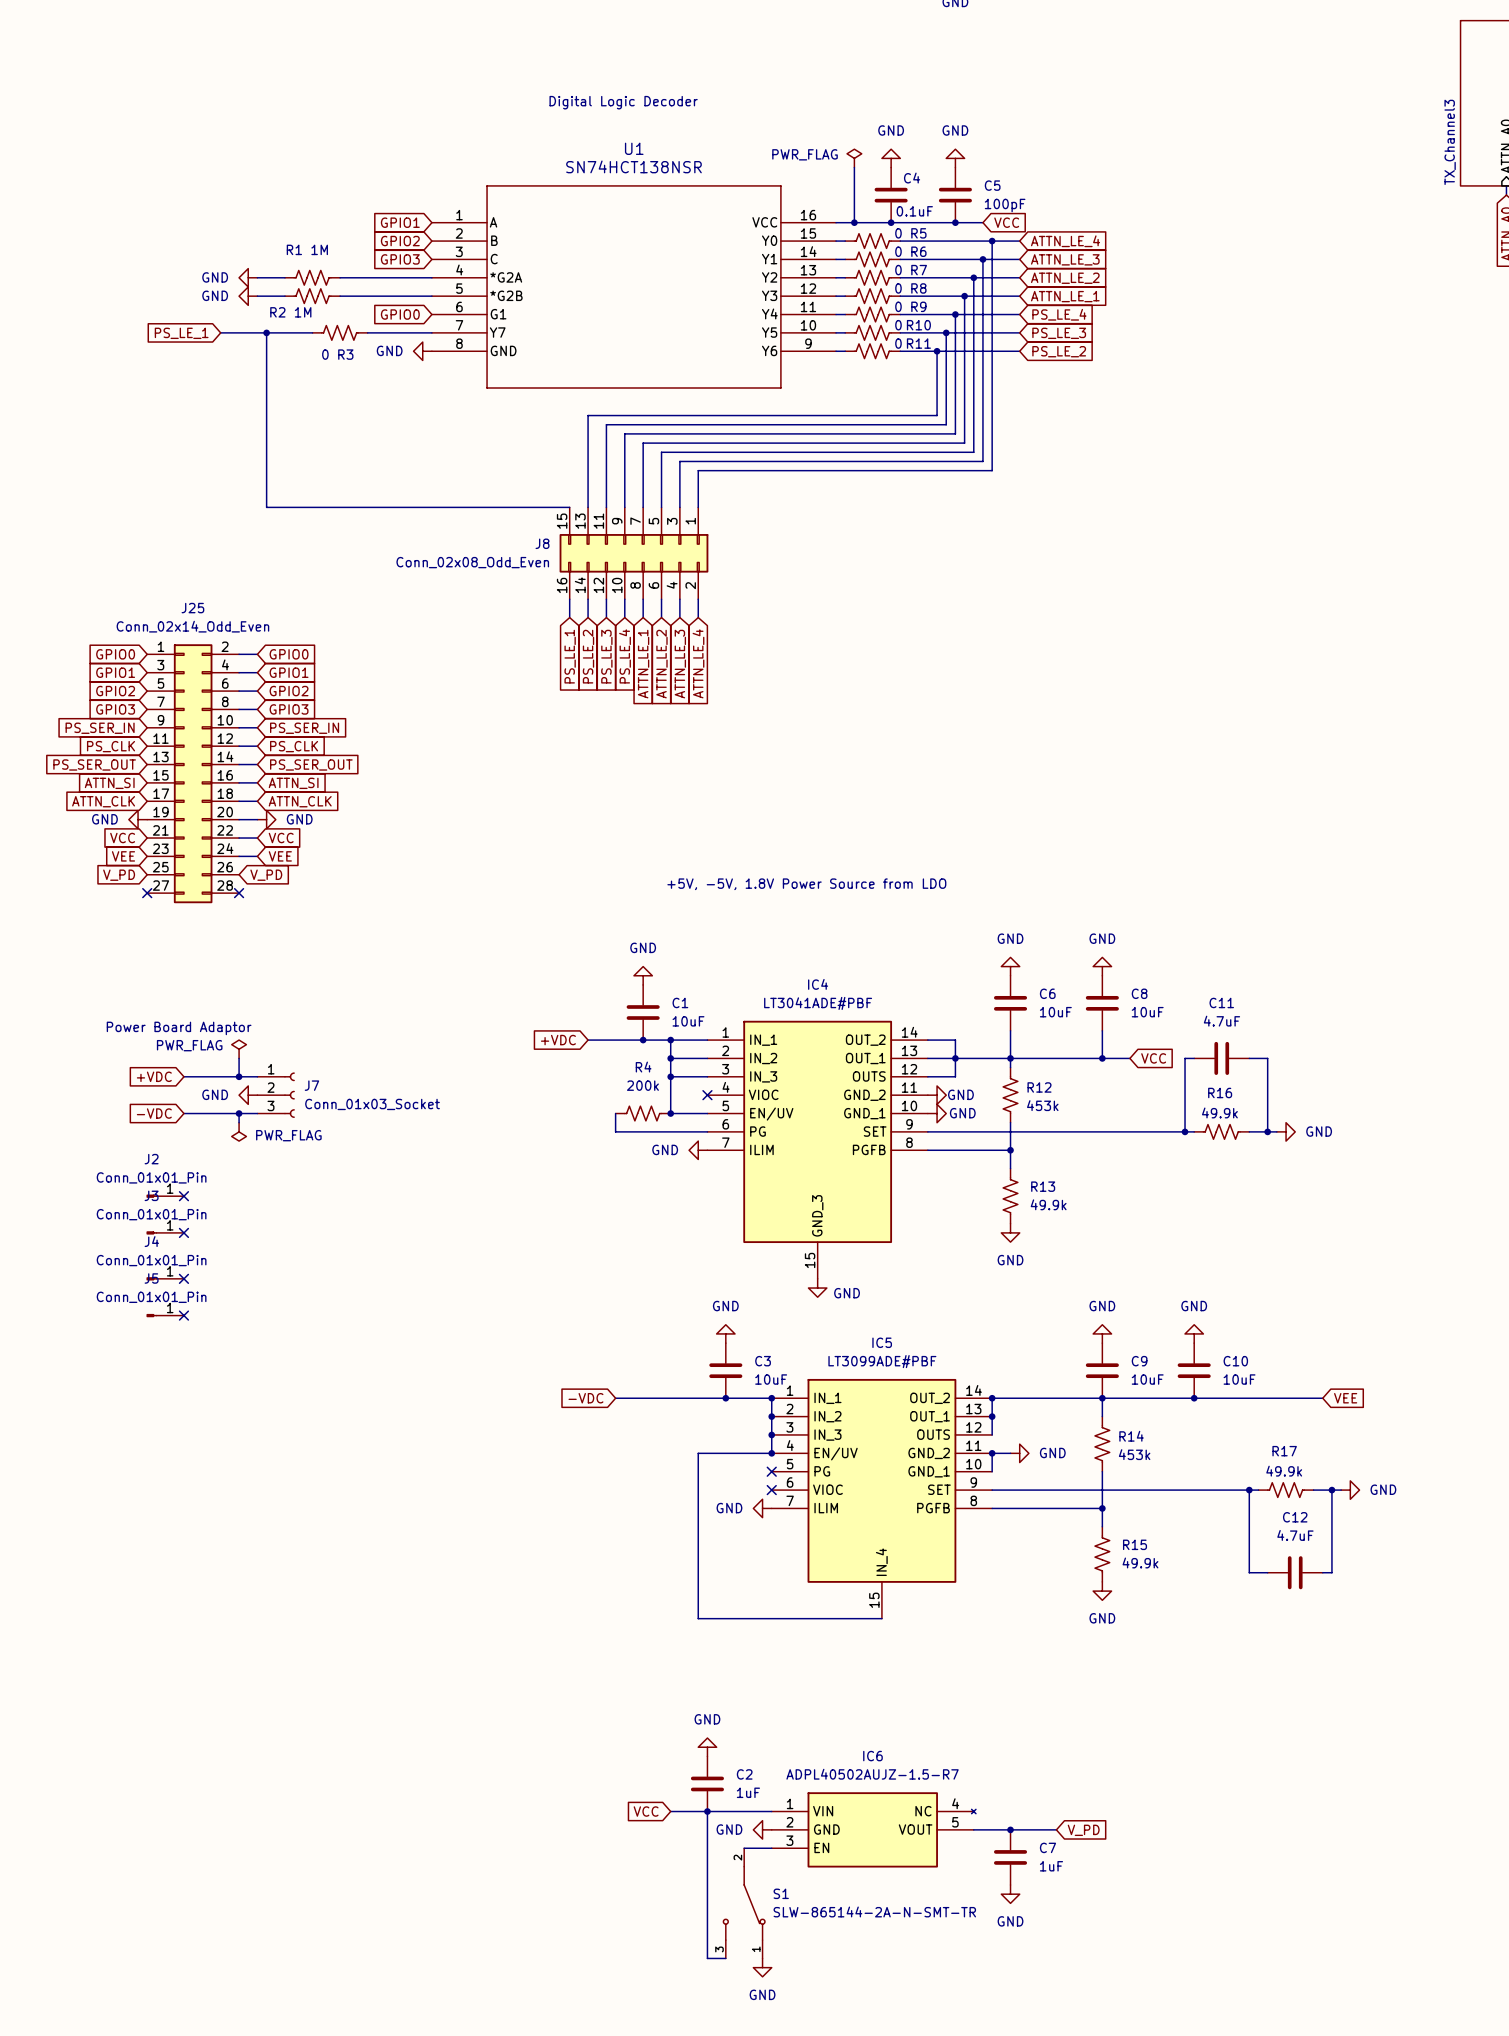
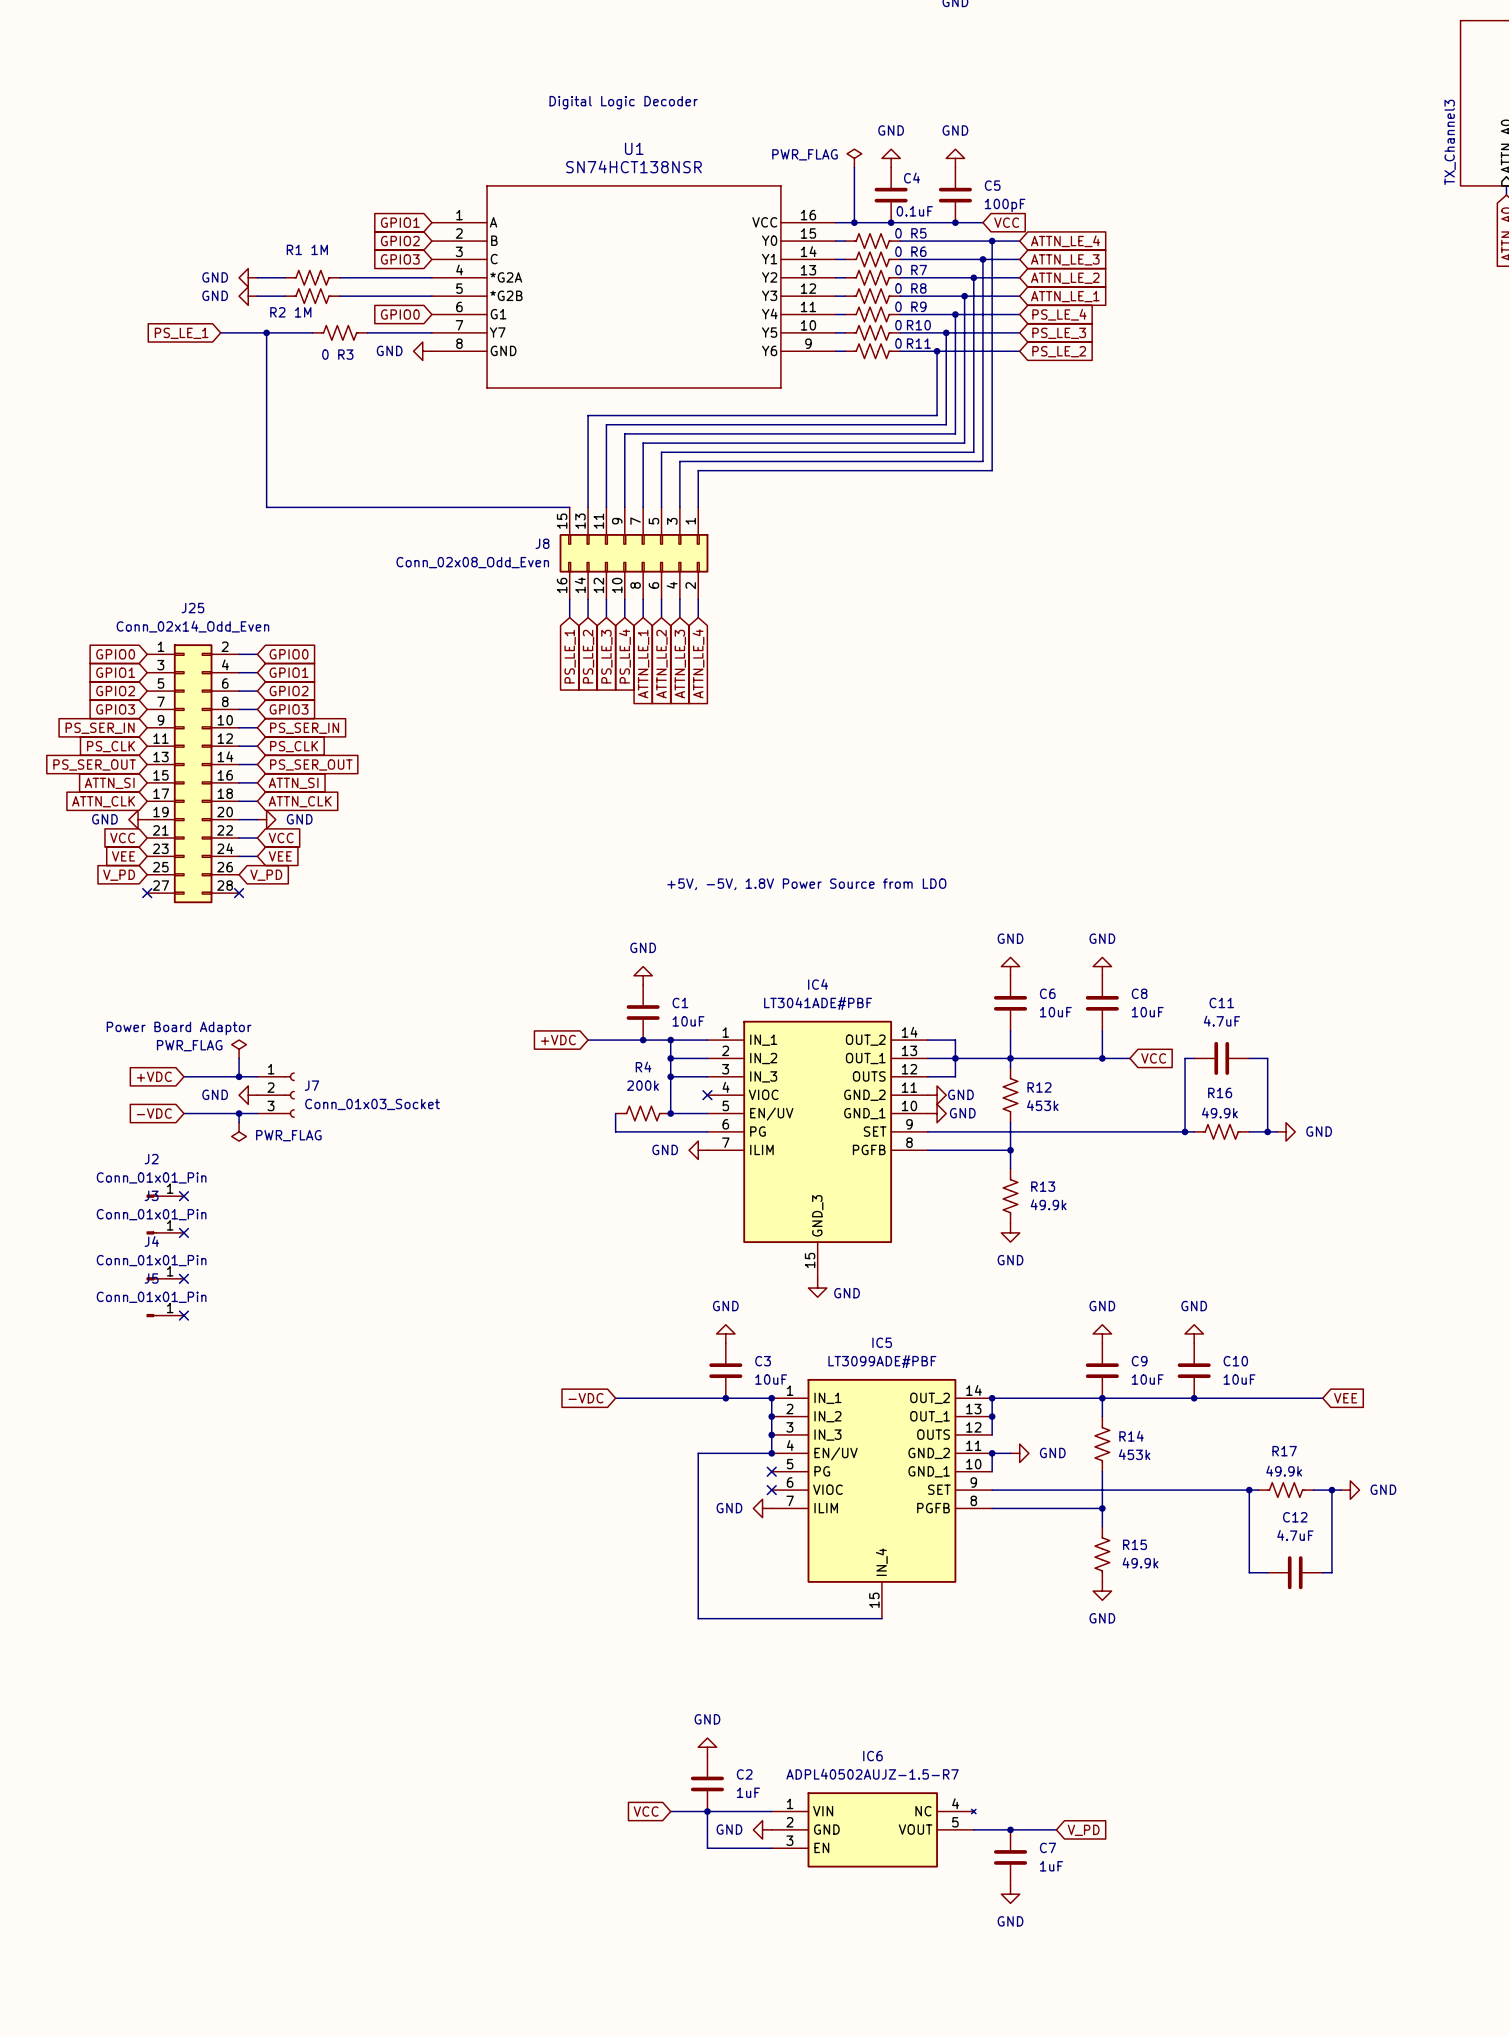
wire: (707, 1848) (707, 1958) (725, 1958) -> (707, 1848) (744, 1848)
S1: SLW-865144-2A-N-SMT-TR (744, 1903) -> none
power symbol: GND (762, 1967) -> none

